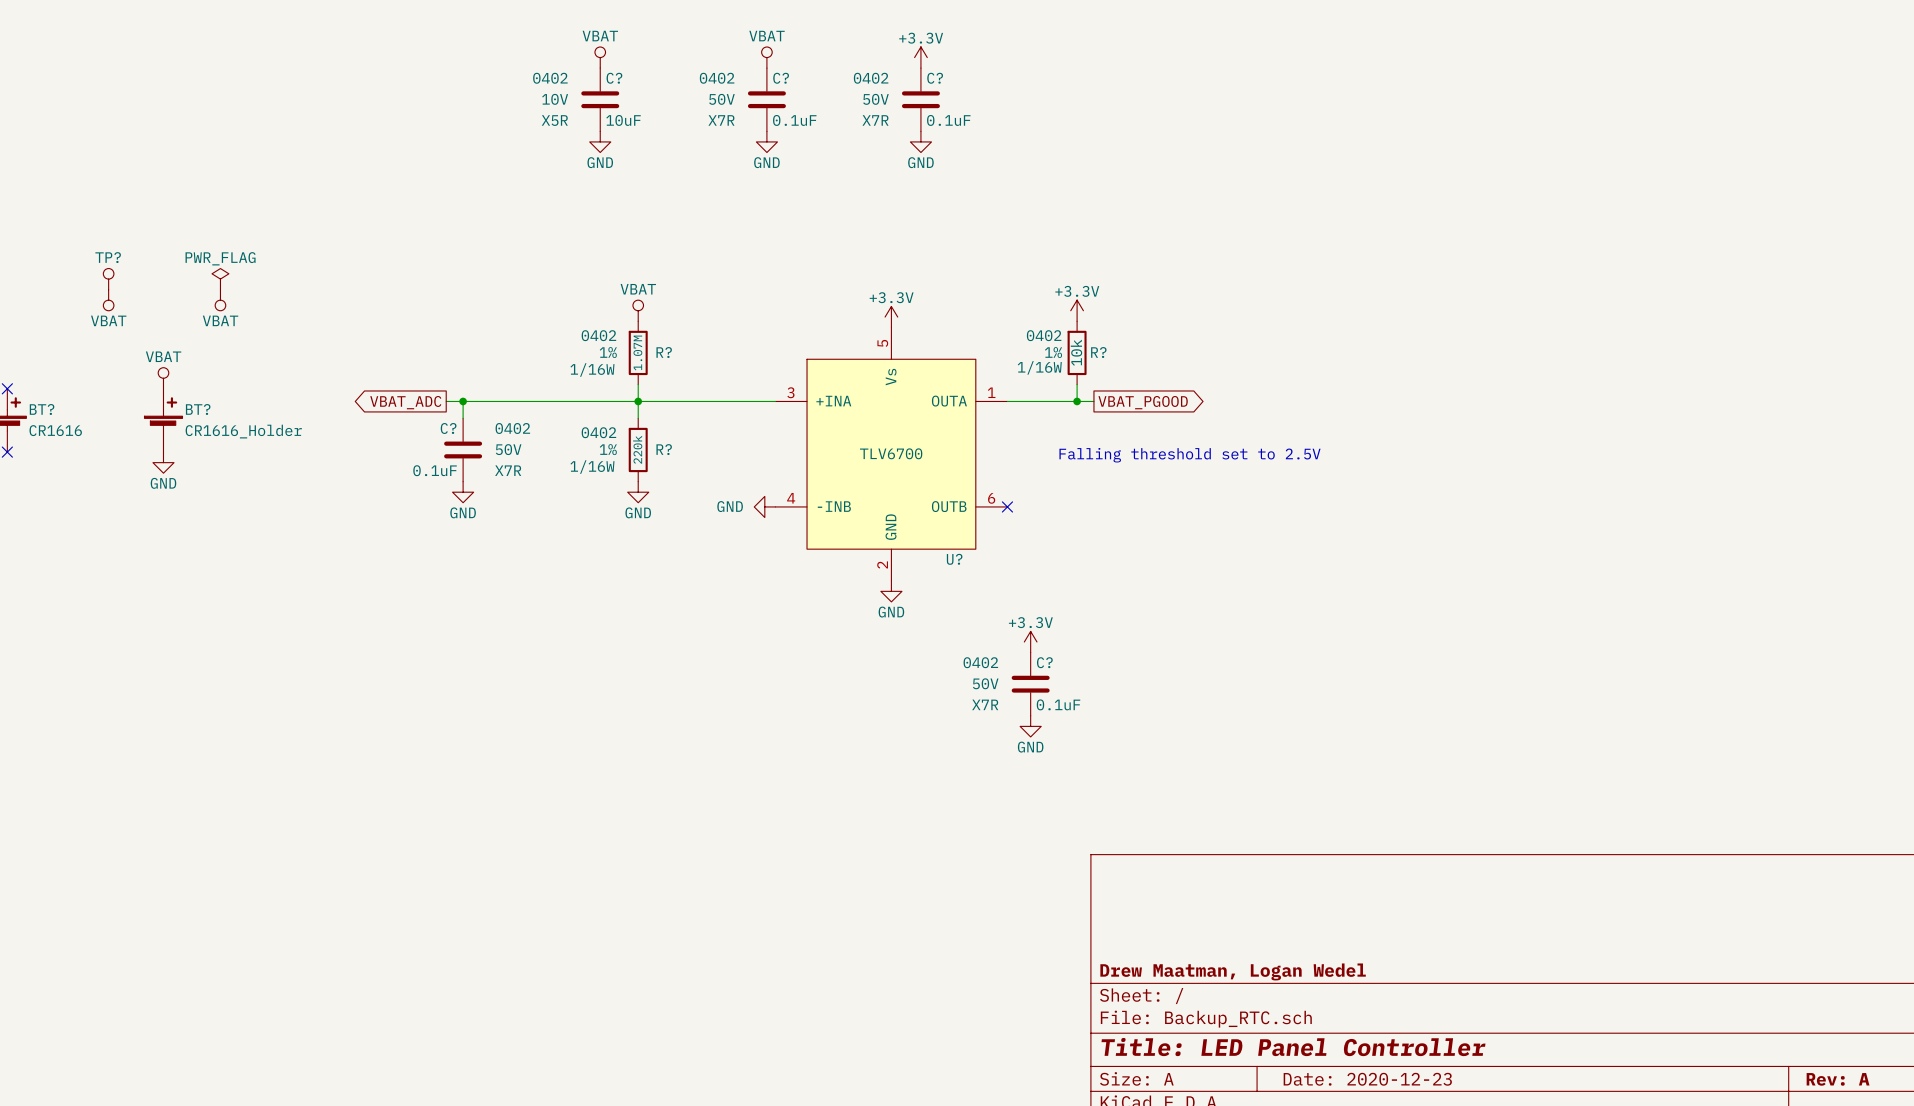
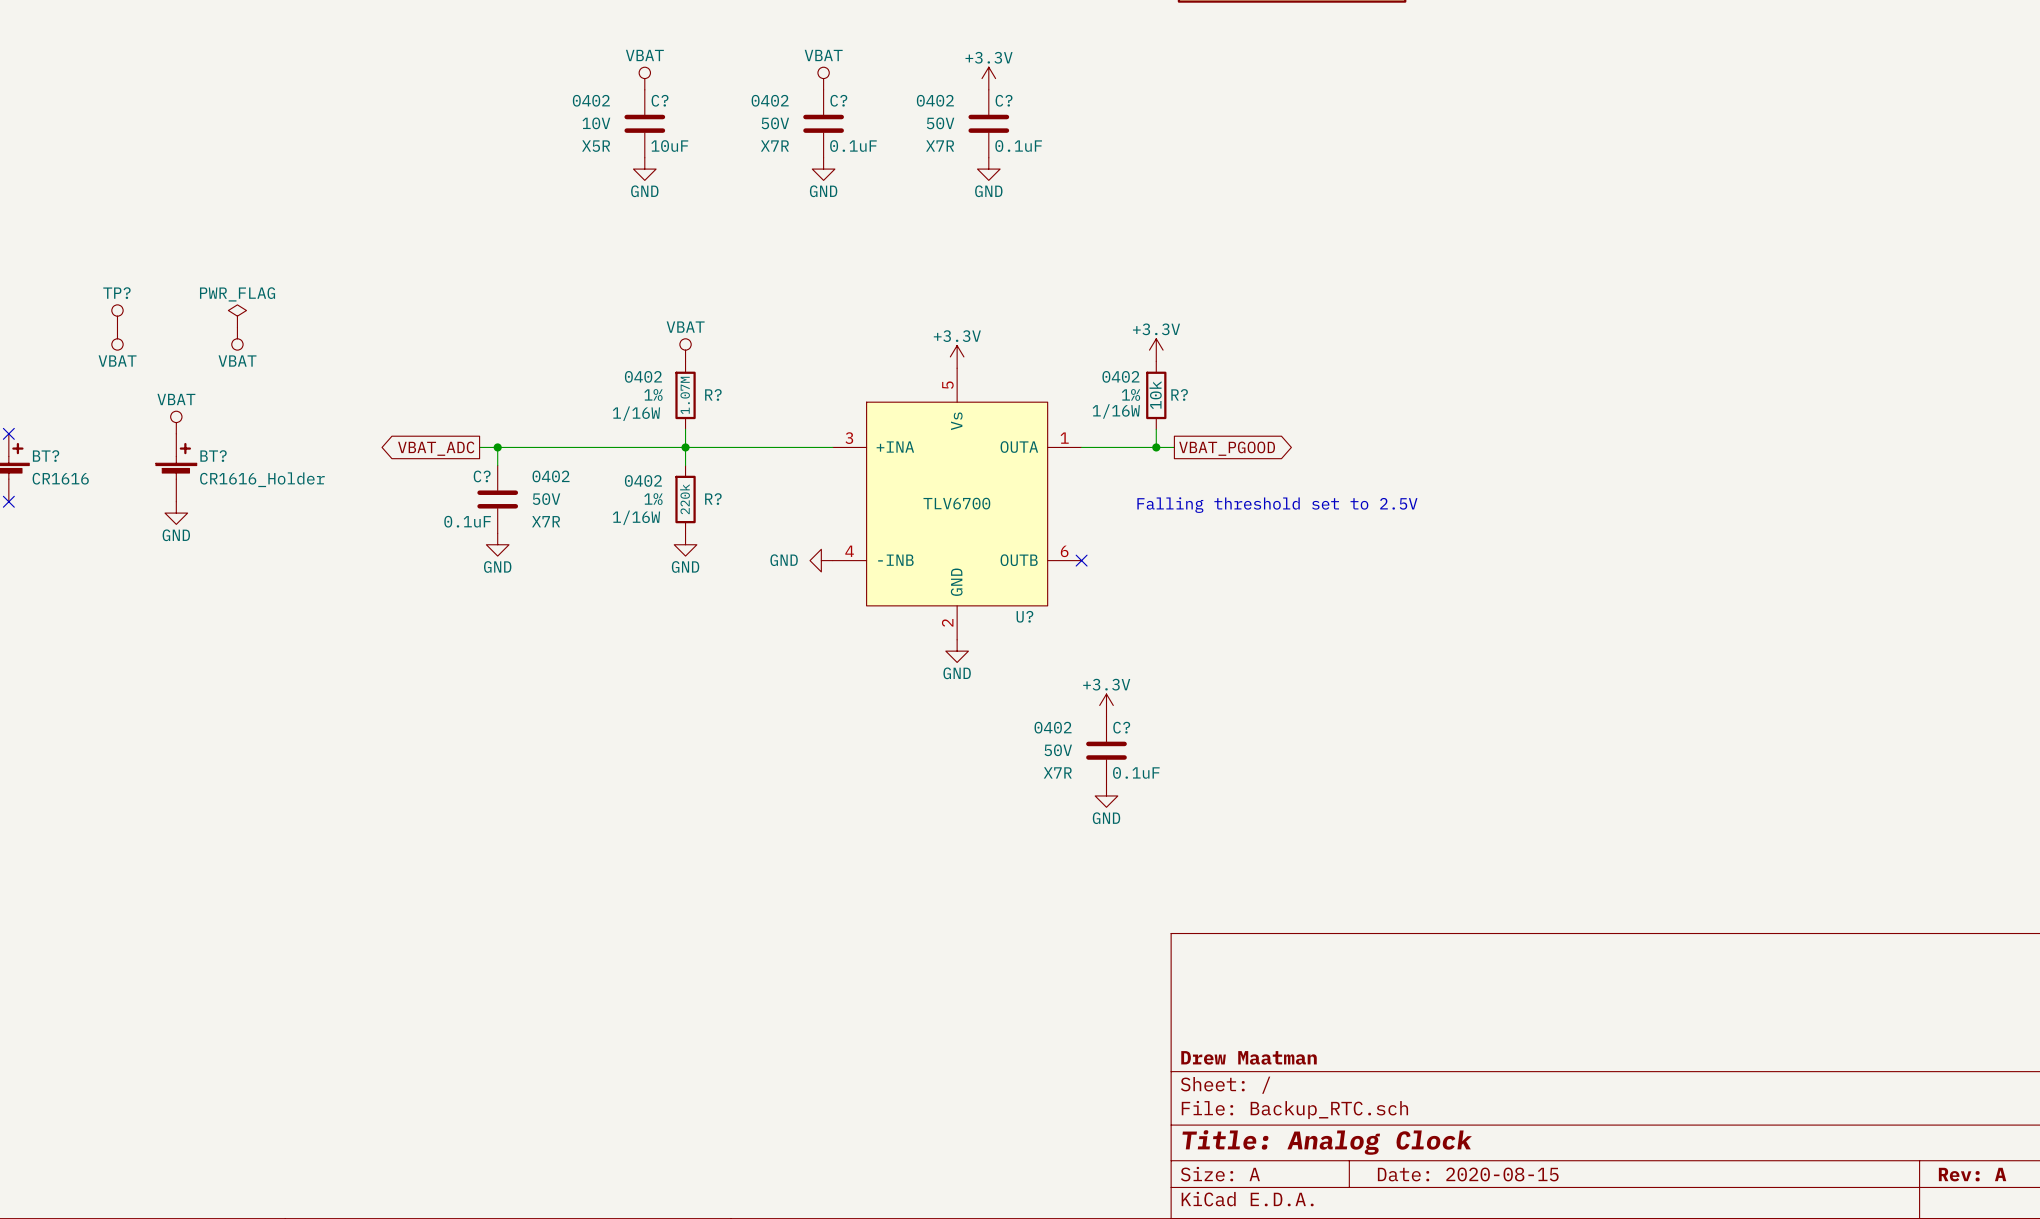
title block: Drew Maatman, Logan Wedel (1233, 971) -> Drew Maatman (1249, 1057)
title block: Title: LED Panel Controller (1293, 1047) -> Title: Analog Clock (1327, 1142)
title block: Date: 2020-12-23 (1367, 1079) -> Date: 2020-08-15 (1468, 1174)

